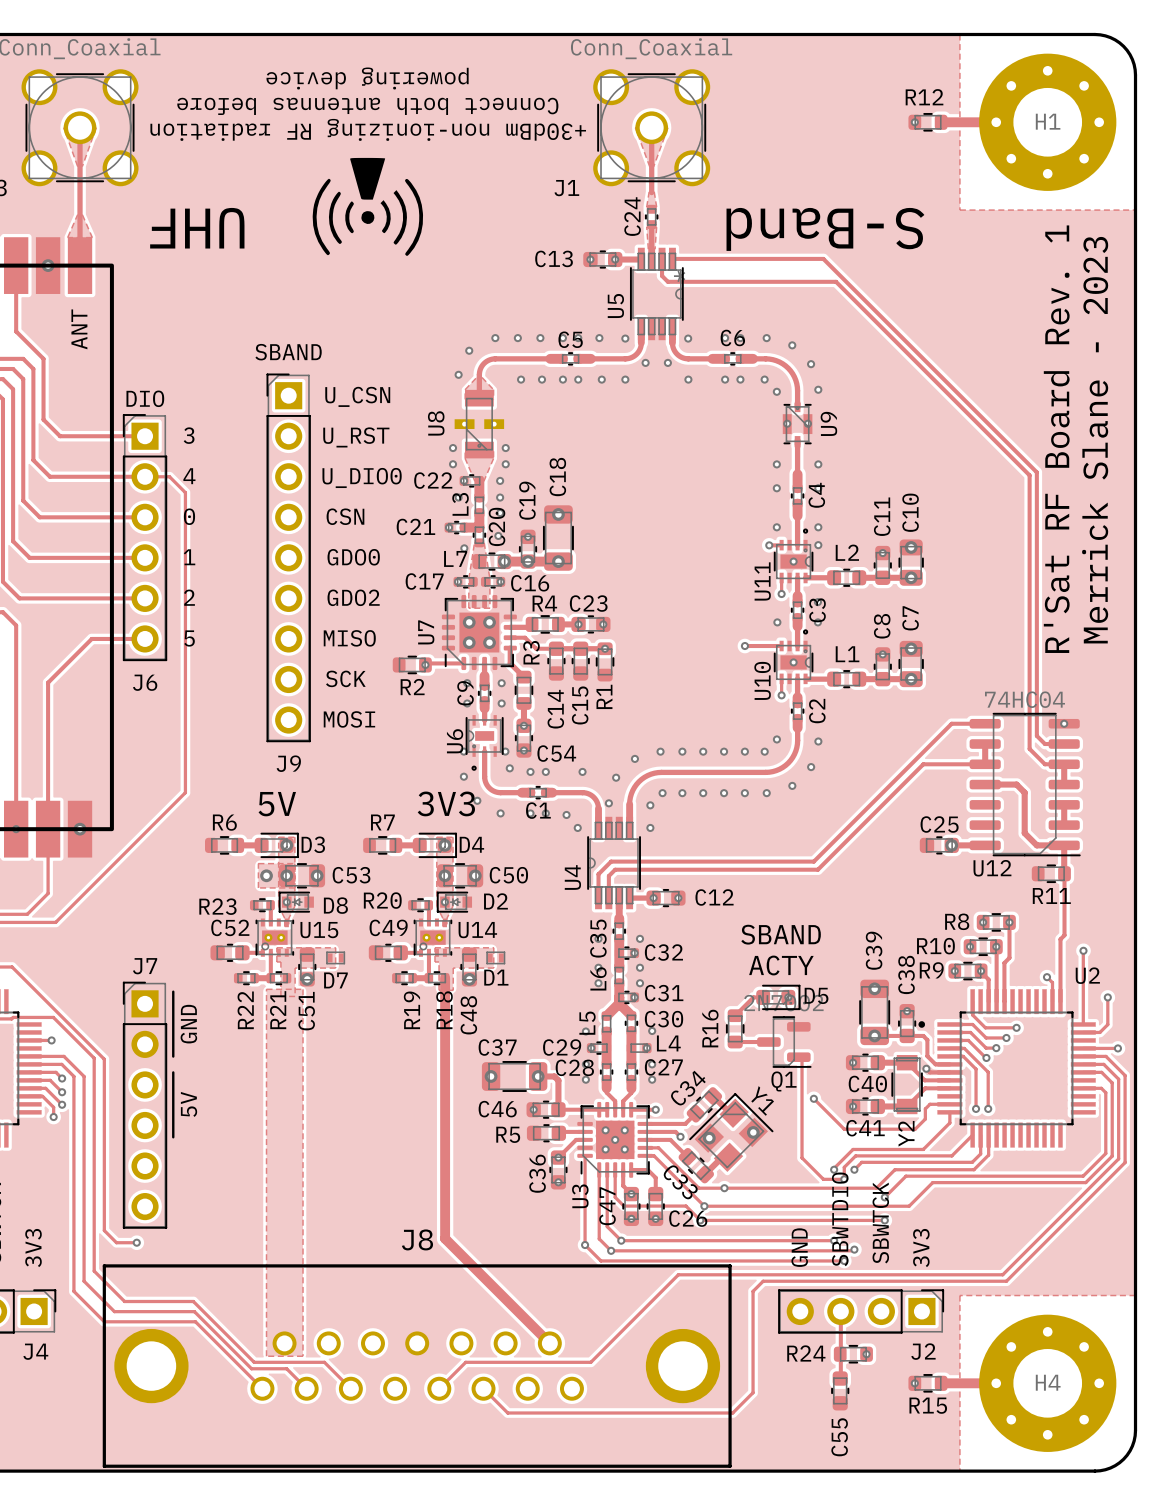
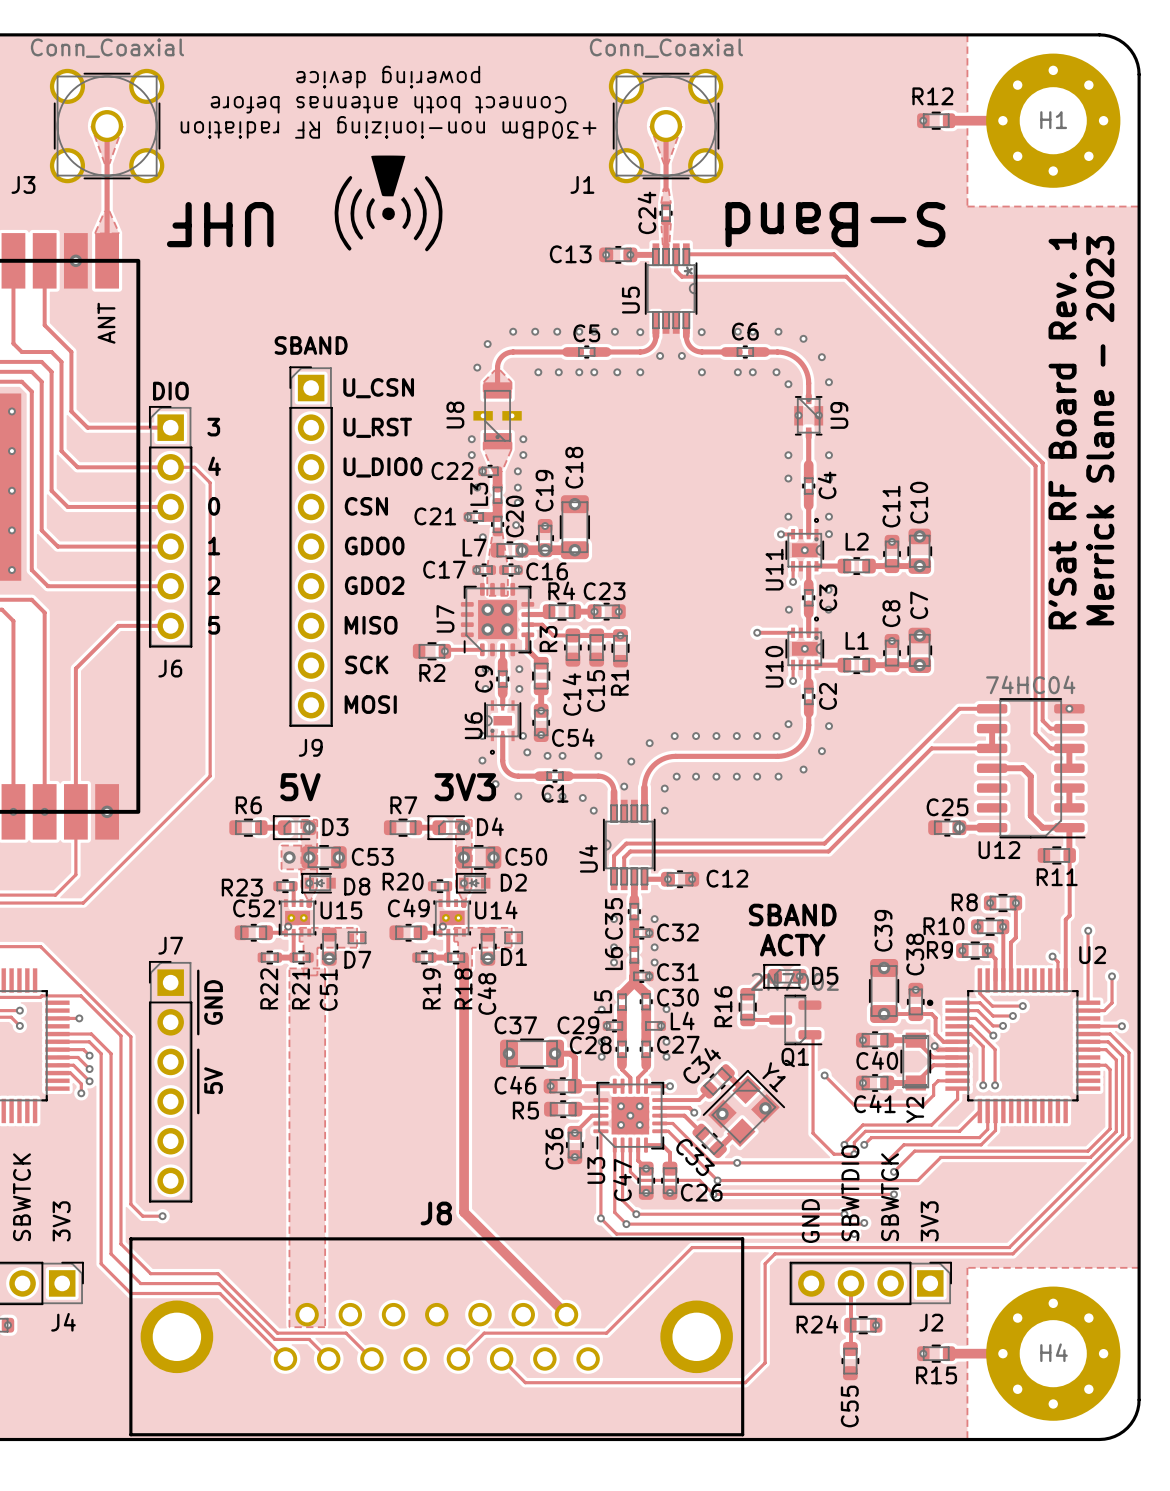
D3 rotation: 0° (276, 845) -> 180° (294, 827)
D4 rotation: 0° (434, 845) -> 180° (449, 827)
D5 rotation: 0° (778, 997) -> 180° (784, 976)

